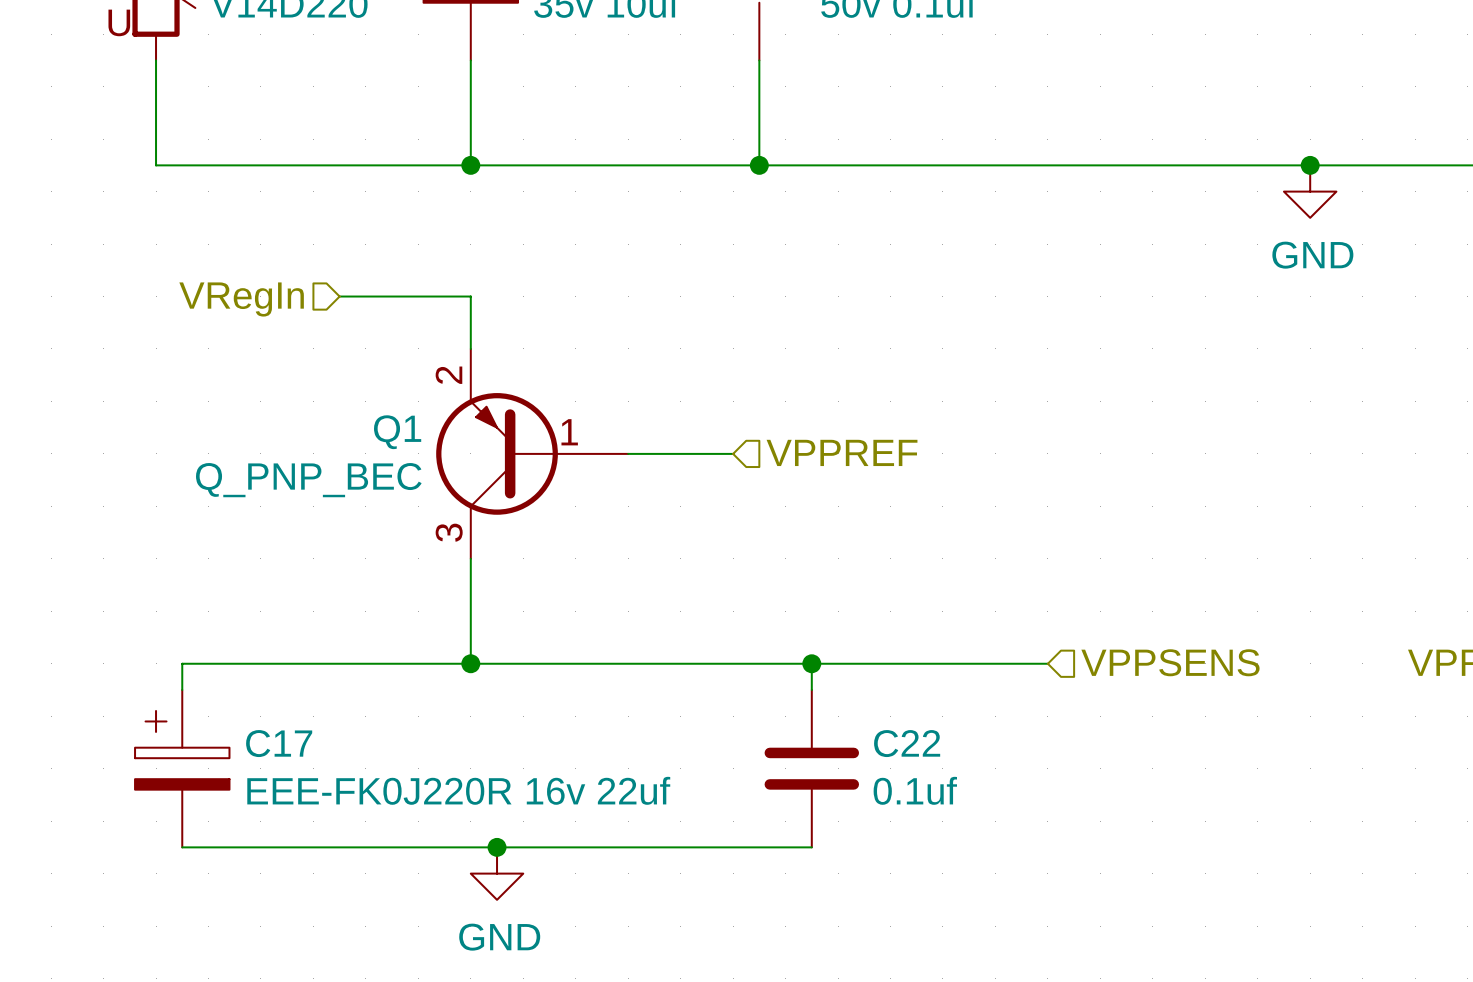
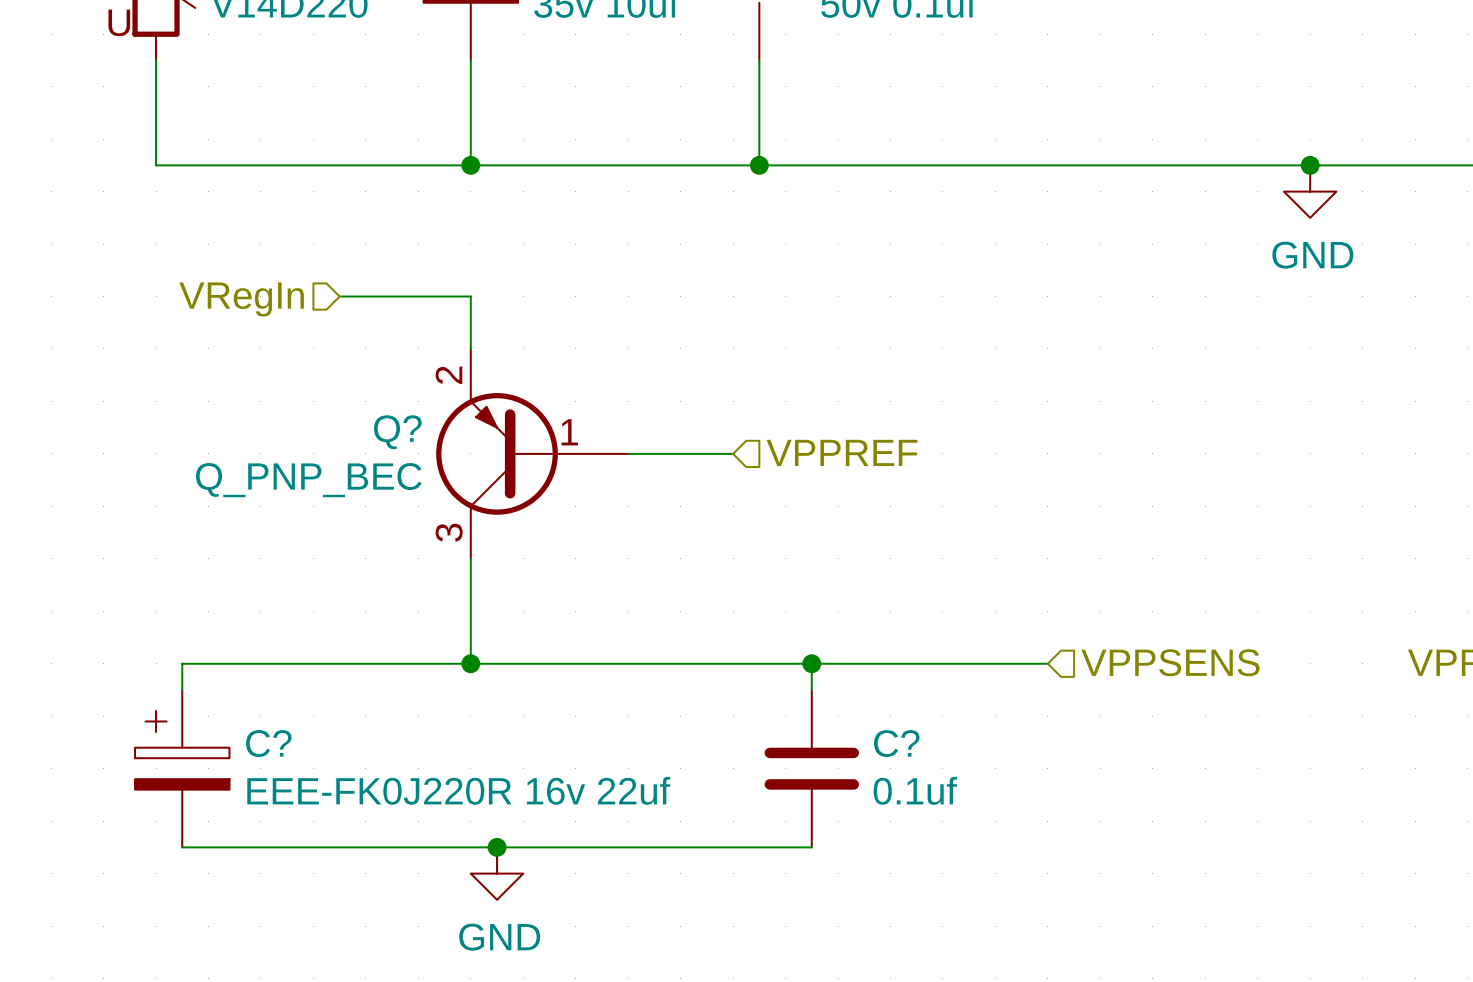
Q1 name: Q1 (397, 432) -> Q? (397, 432)
C17 name: C17 (279, 743) -> C? (268, 743)
C22 name: C22 (907, 743) -> C? (896, 743)

